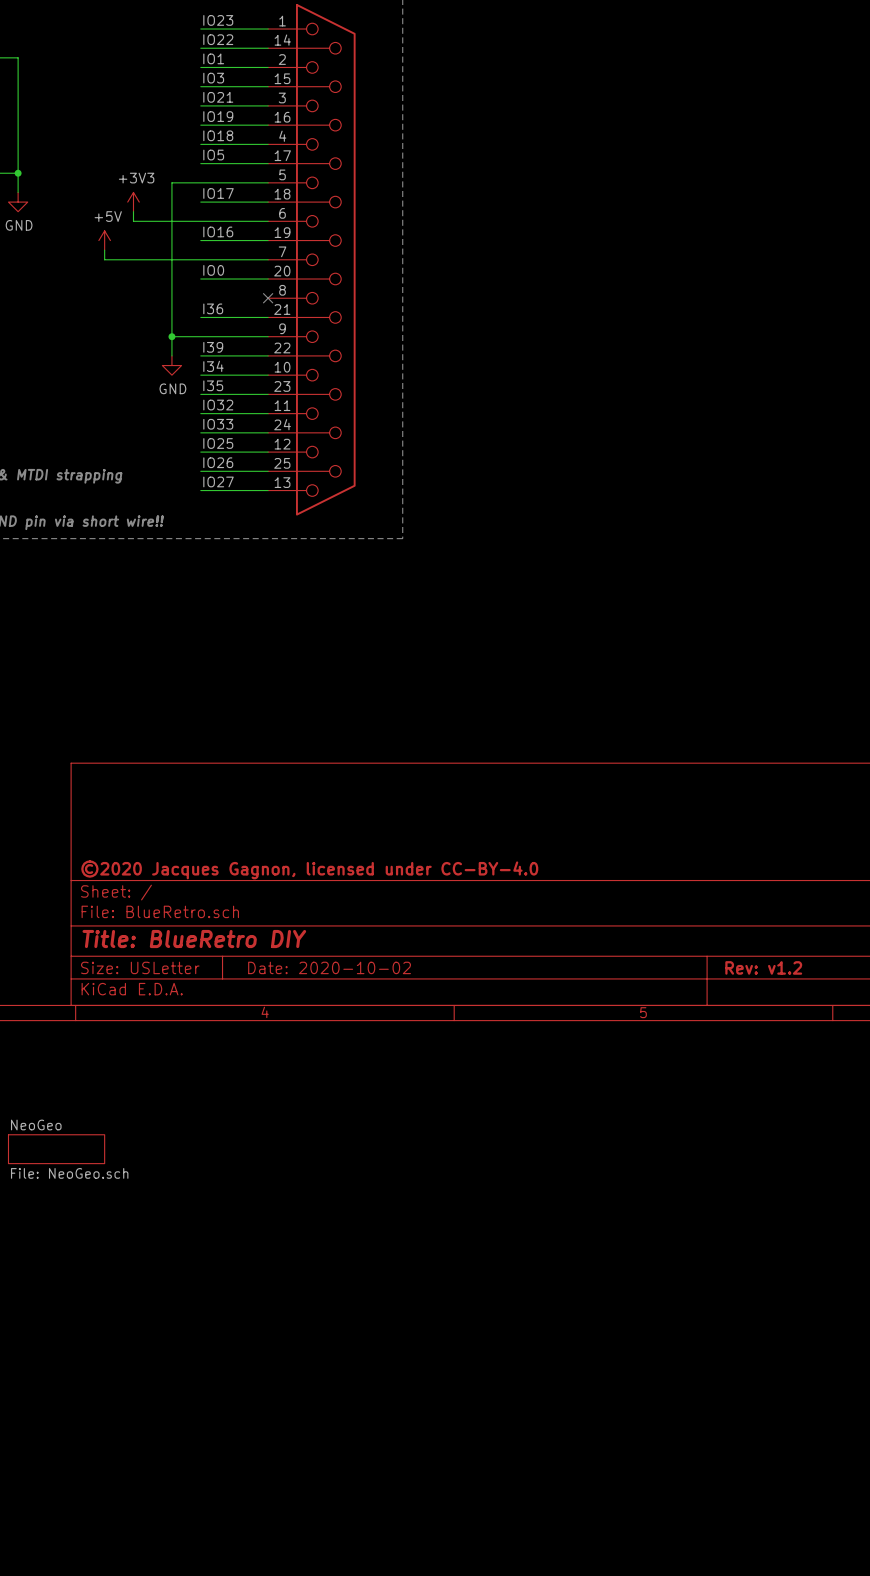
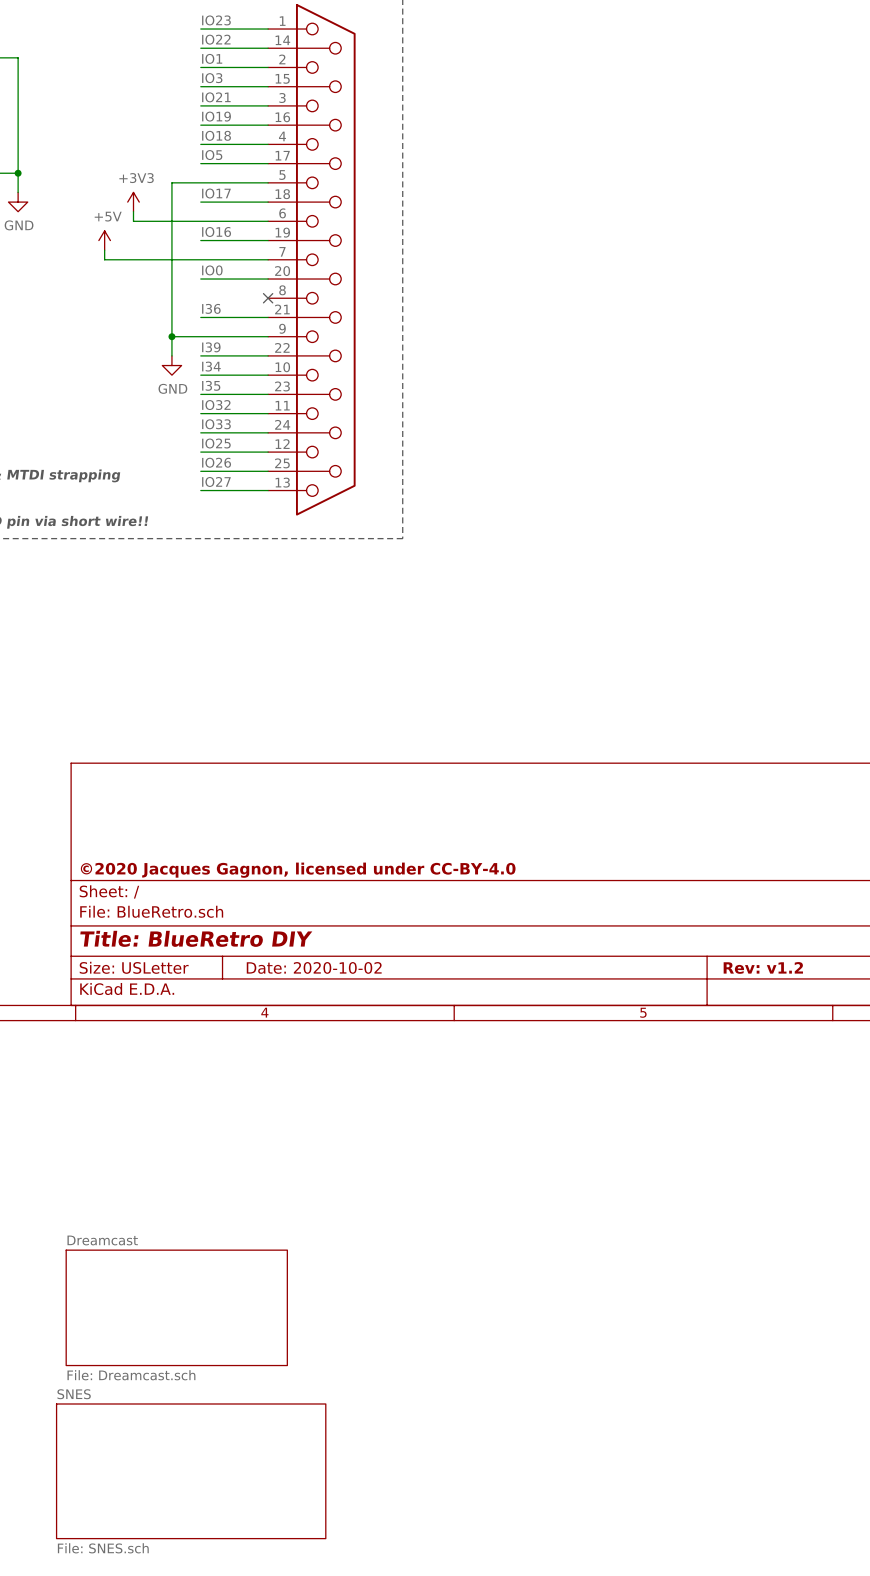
sheet NeoGeo: File: NeoGeo.sch (56, 1149) -> none
sheet Dreamcast: none -> File: Dreamcast.sch (176, 1307)
sheet SNES: none -> File: SNES.sch (191, 1471)

